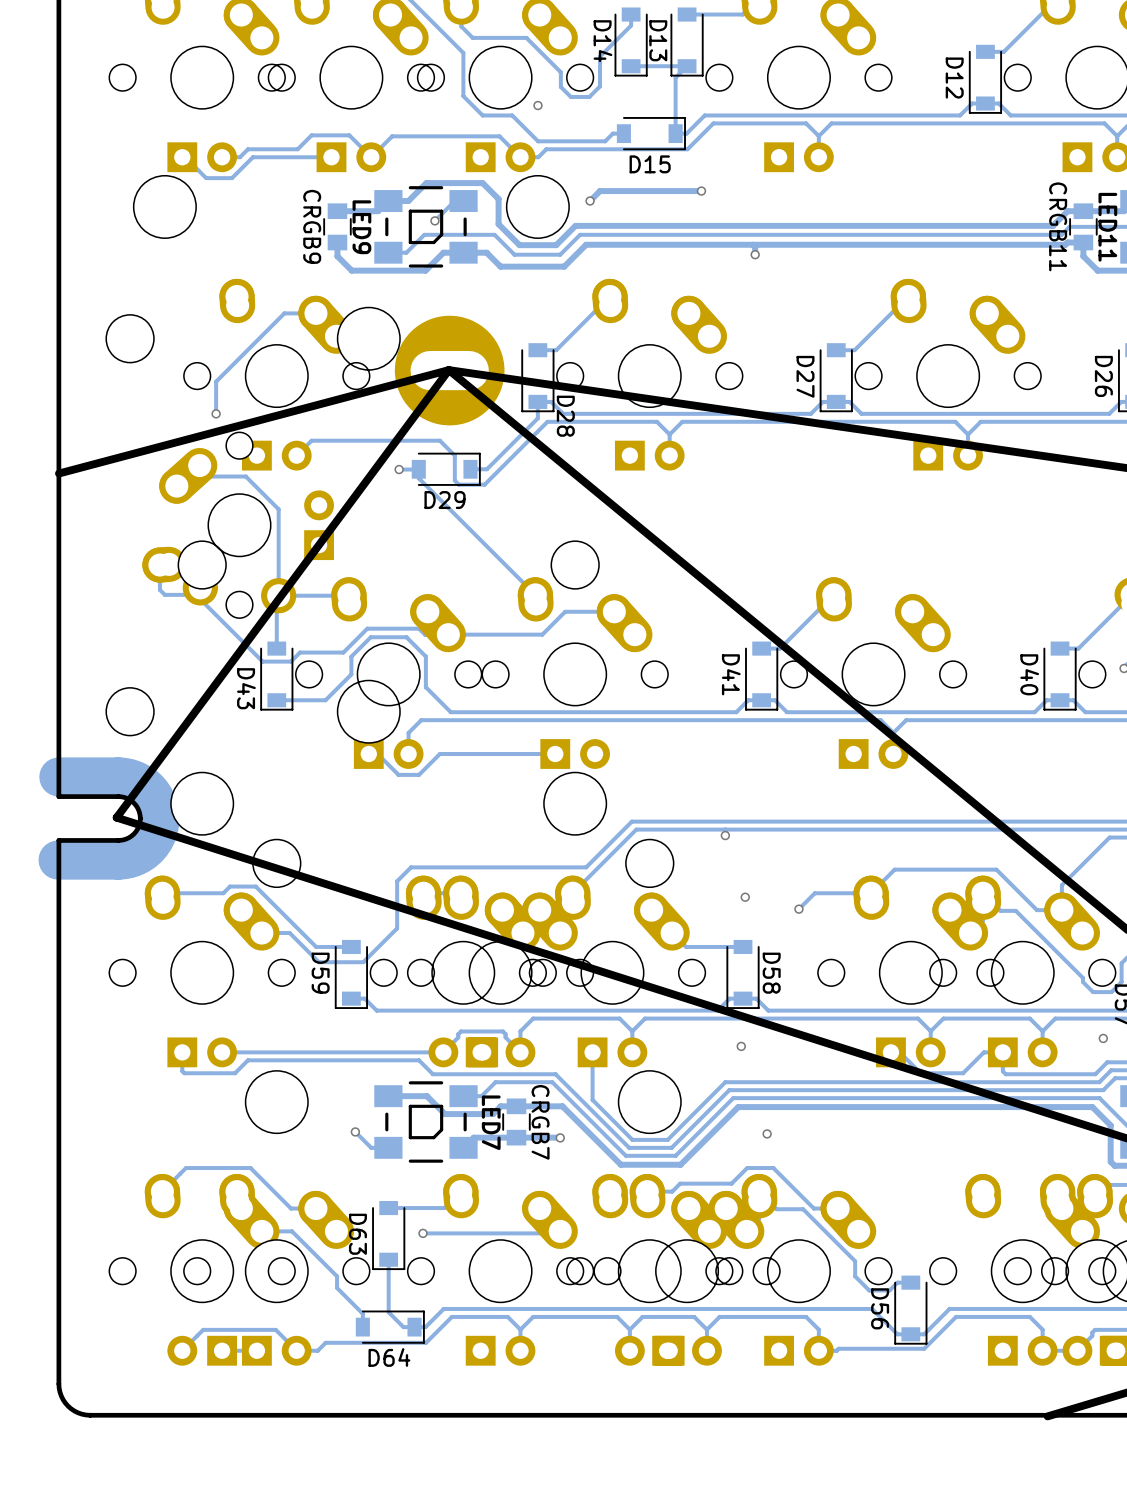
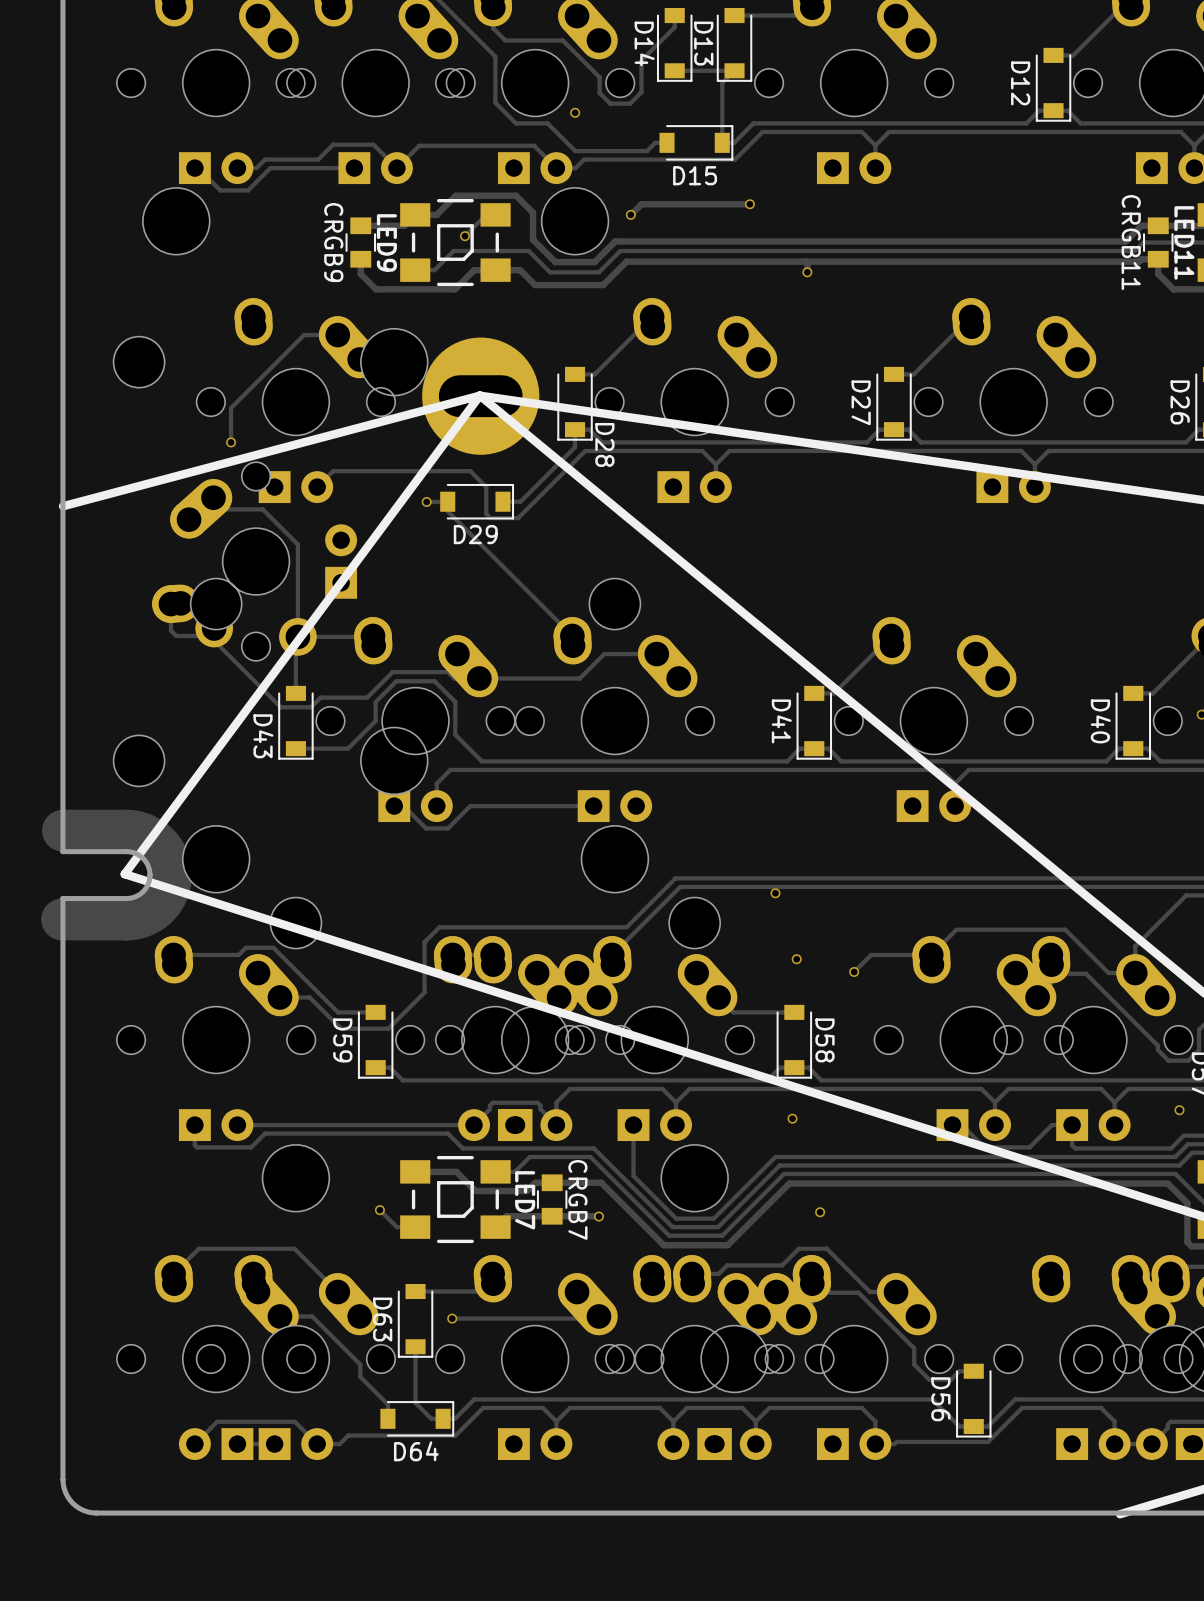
track: (250, 1168) (291, 1208) (315, 1208) -> (267, 1248) (294, 1248) (337, 1292)

